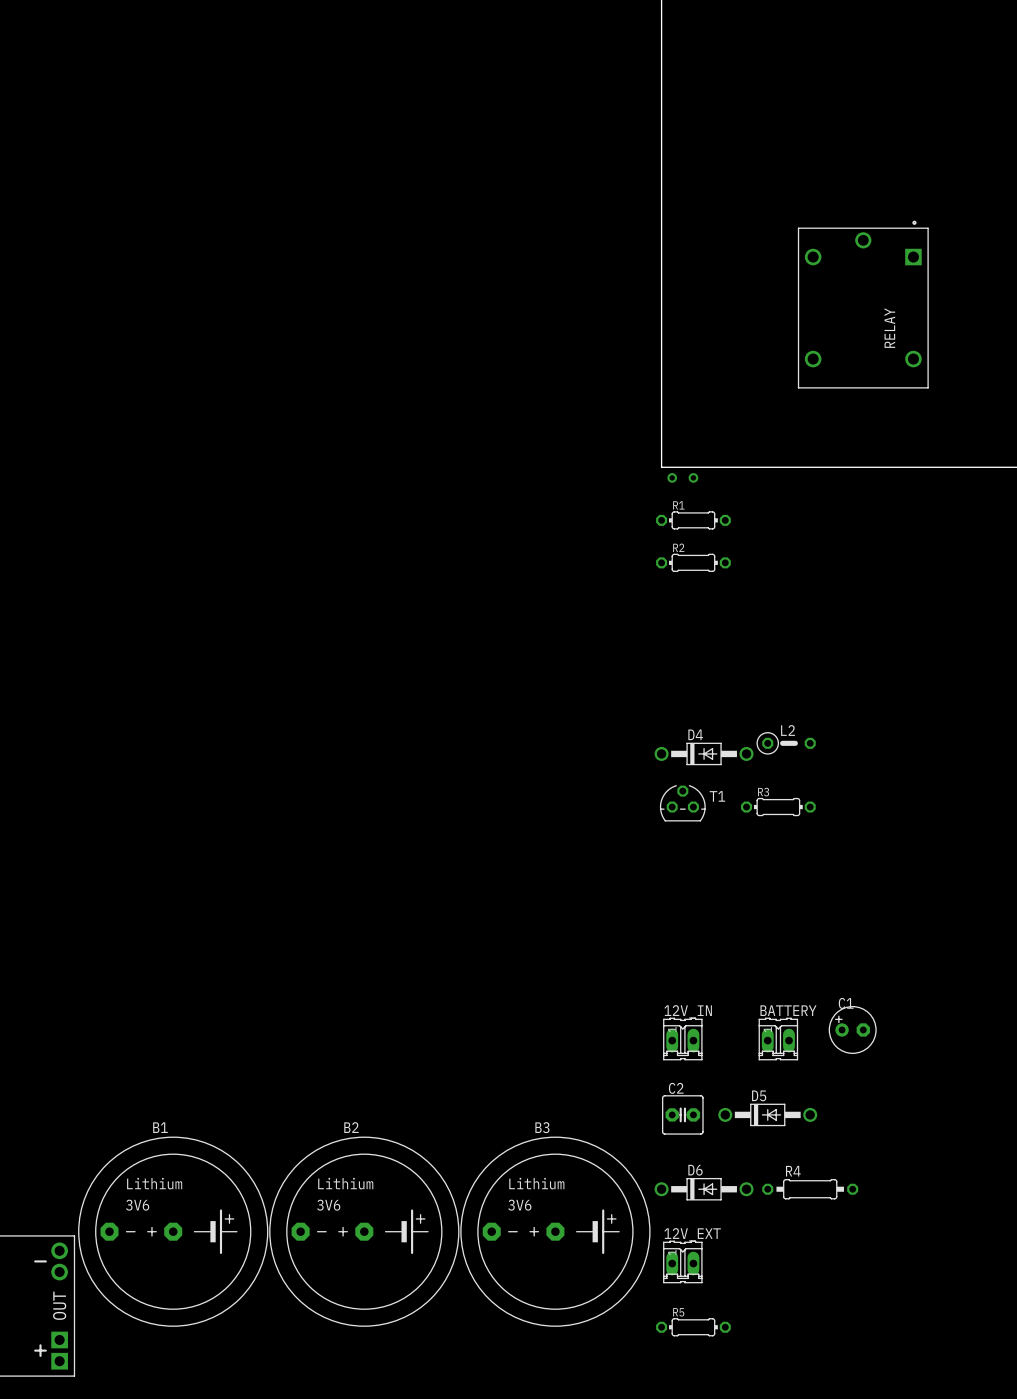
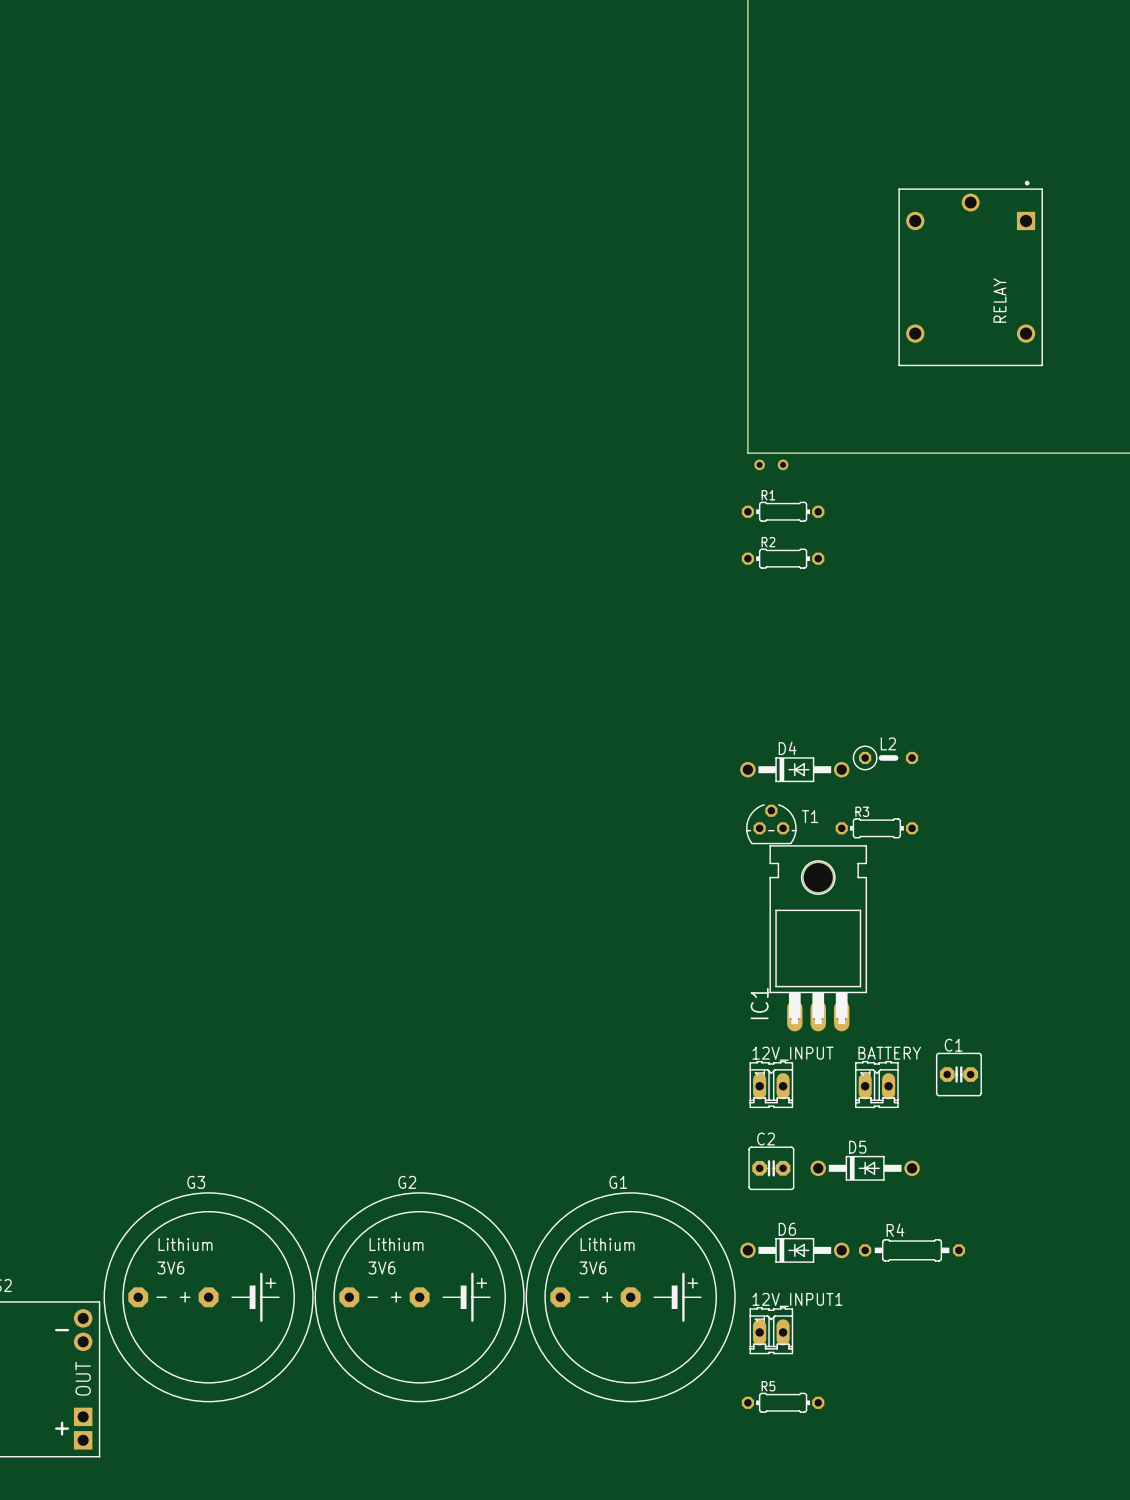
IC1: none -> (818, 938)
C1 footprint: [828, 1005, 877, 1054] -> [935, 1052, 982, 1097]
12V_IN name: 12V_IN (688, 1011) -> 12V_INPUT (792, 1053)
B1 name: B1 (160, 1127) -> G3 (196, 1182)
B2 name: B2 (351, 1127) -> G2 (407, 1182)
B3 name: B3 (542, 1127) -> G1 (618, 1182)
12V_EXT name: 12V_EXT (692, 1234) -> 12V_INPUT1 (797, 1299)

